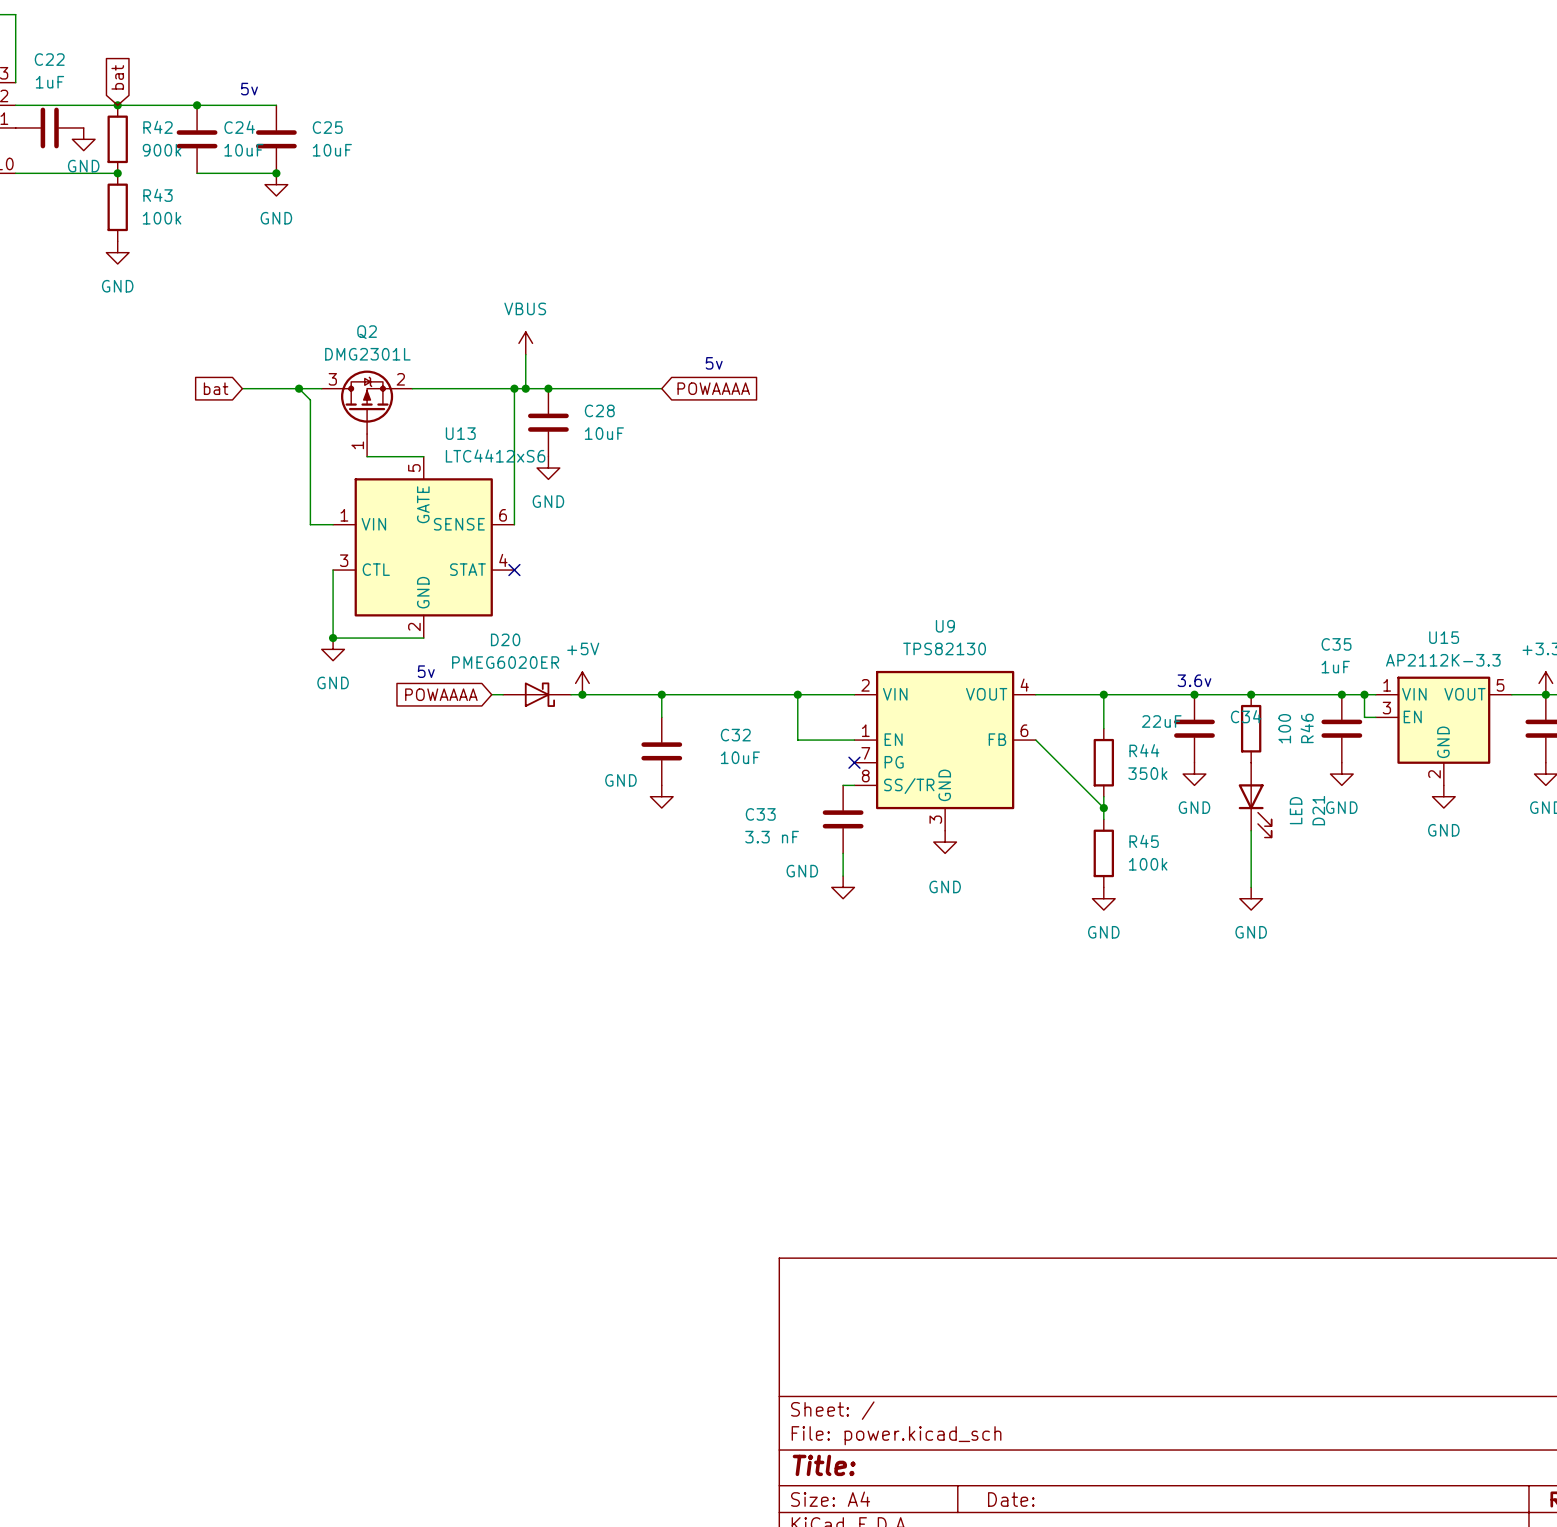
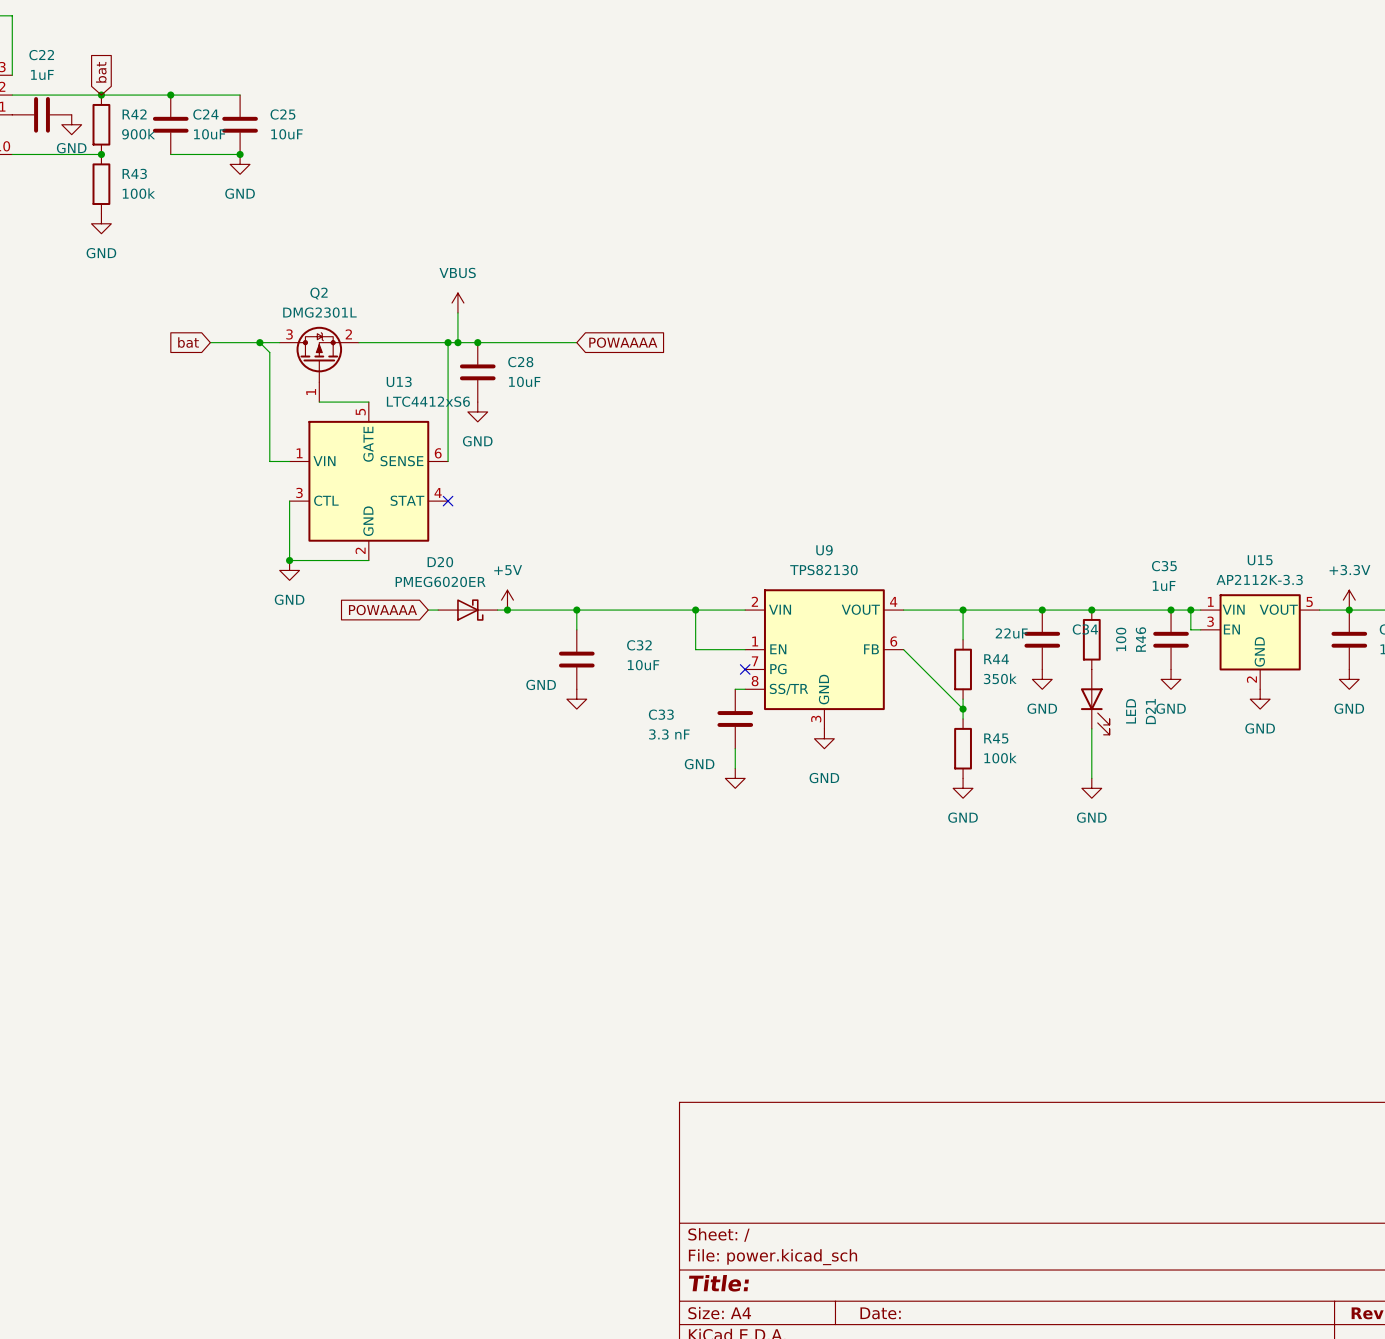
text: 5v (249, 89) -> none
text: 5v (714, 363) -> none
text: 5v (426, 671) -> none
text: 3.6v (1194, 680) -> none

